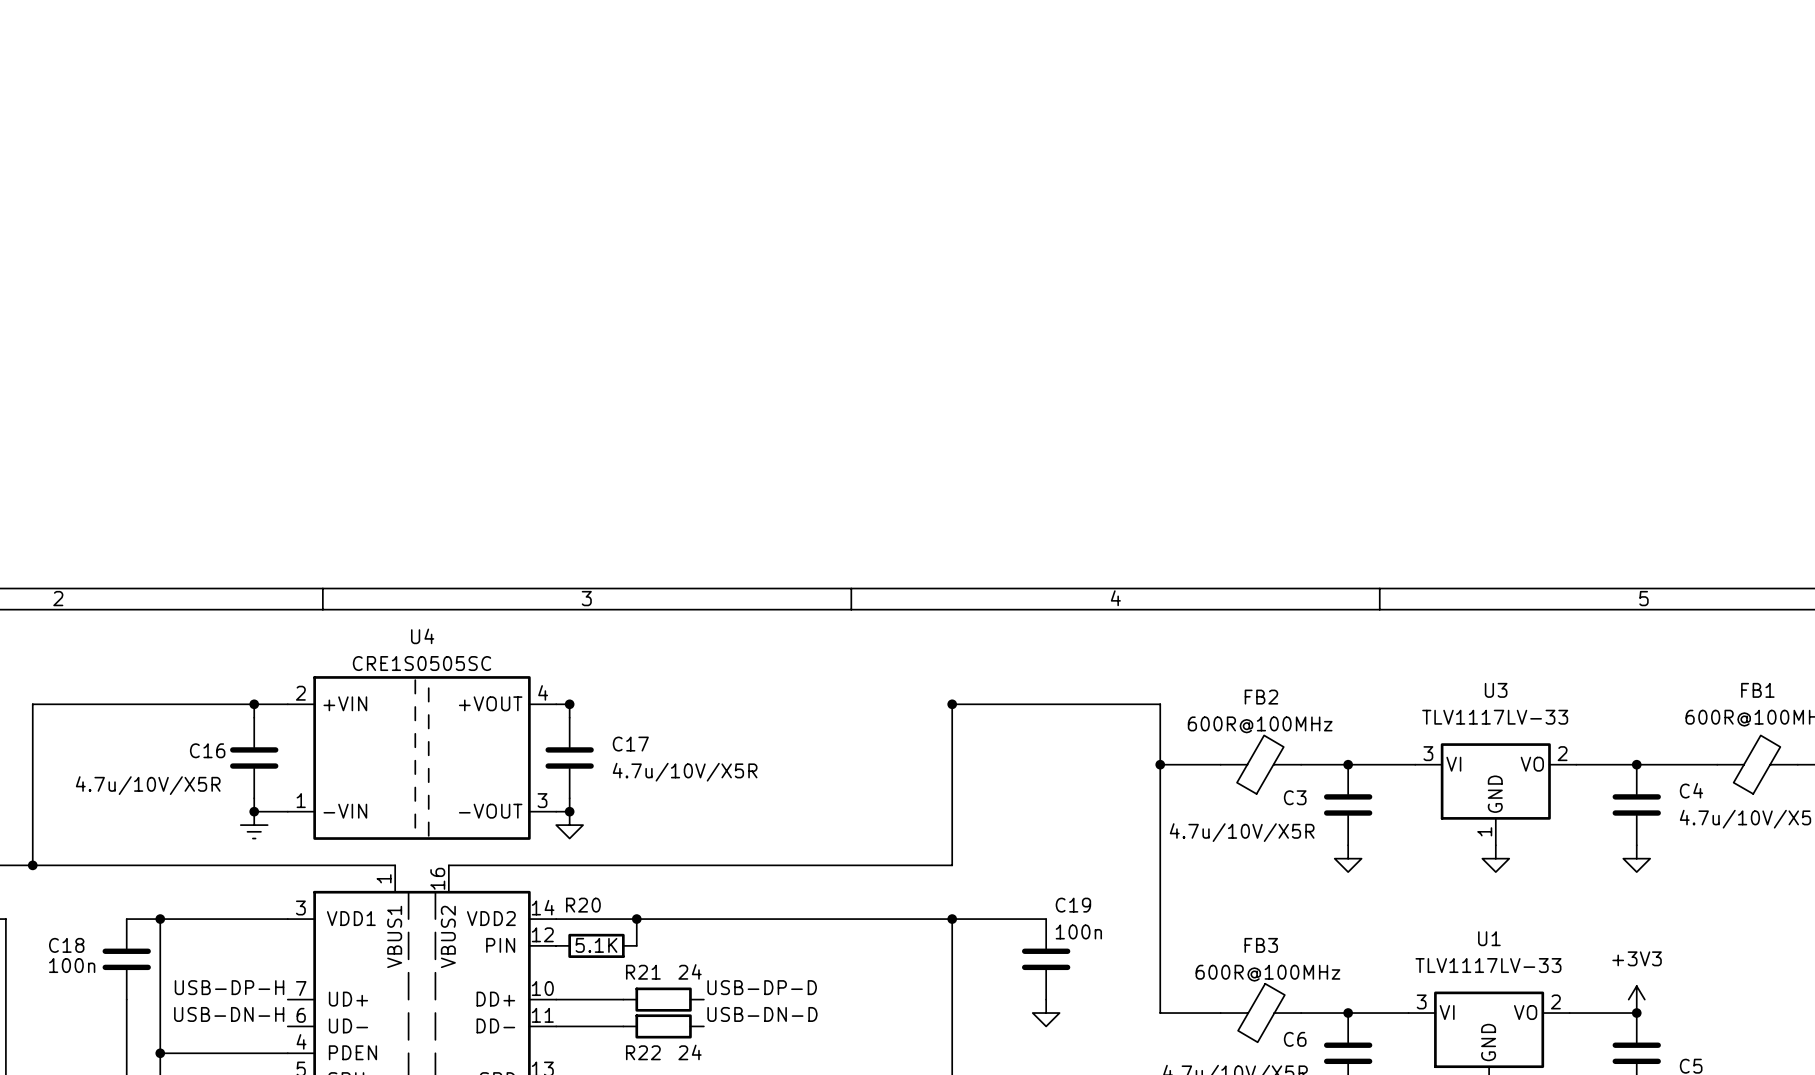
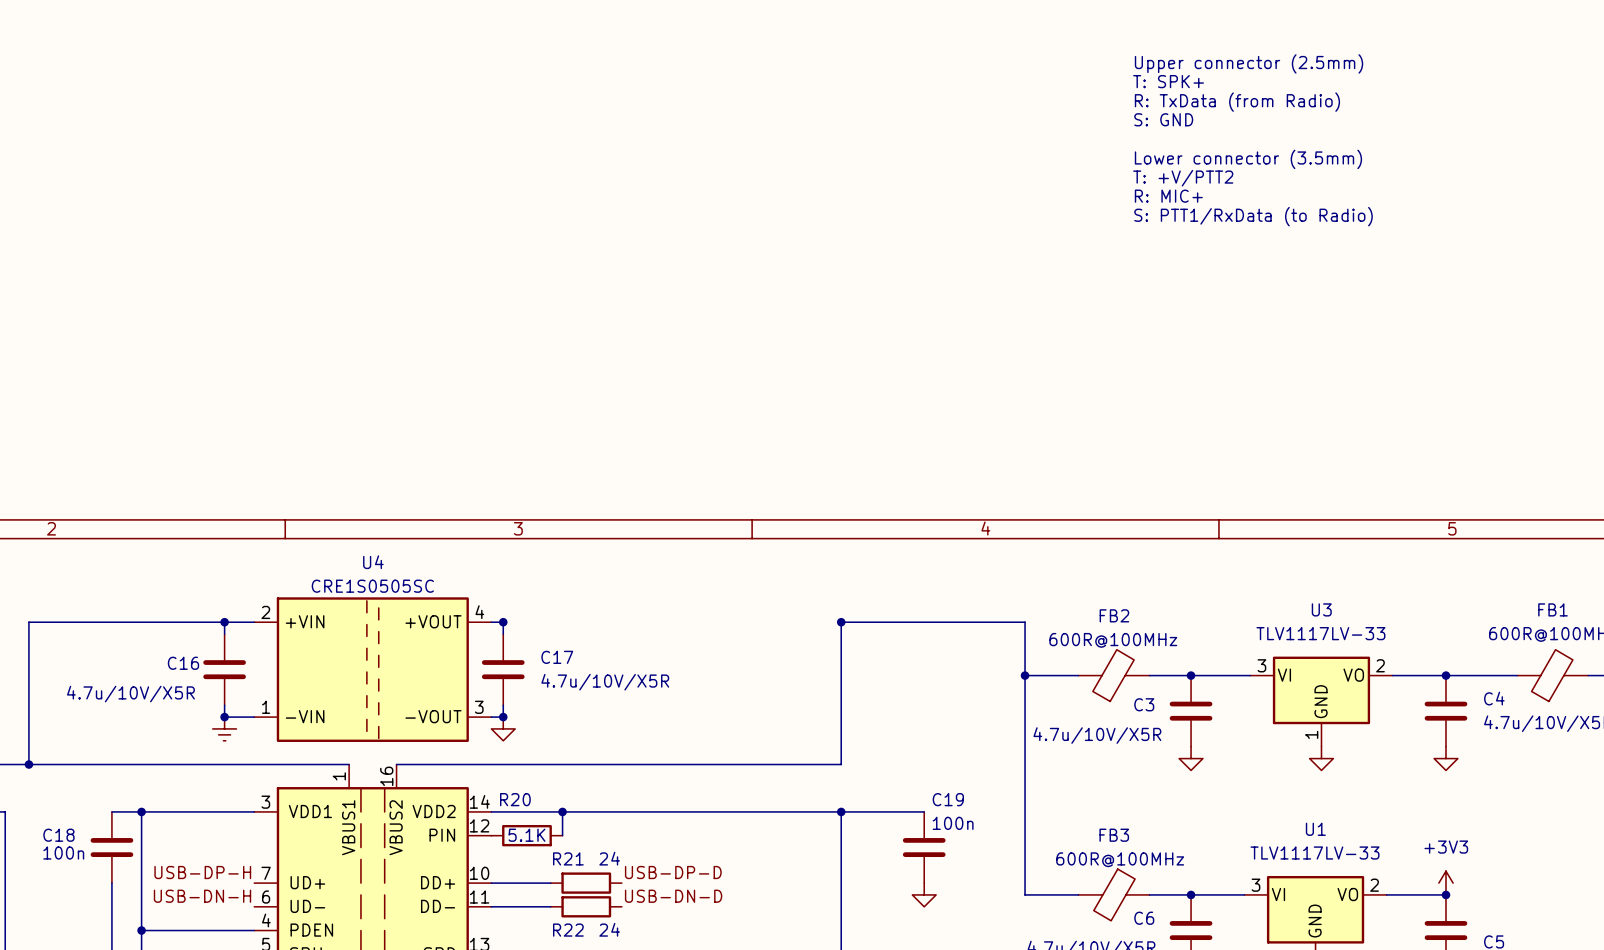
text: none -> Upper connector (2.5mm) (1249, 63)
text: none -> T: SPK+ (1168, 81)
text: none -> R: TxData (from Radio) (1237, 102)
text: none -> S: GND (1163, 119)
text: none -> Lower connector (3.5mm) (1248, 159)
text: none -> T: +V/PTT2 (1183, 178)
text: none -> R: MIC+ (1168, 196)
text: none -> S: PTT1/RxData (to Radio) (1253, 216)

